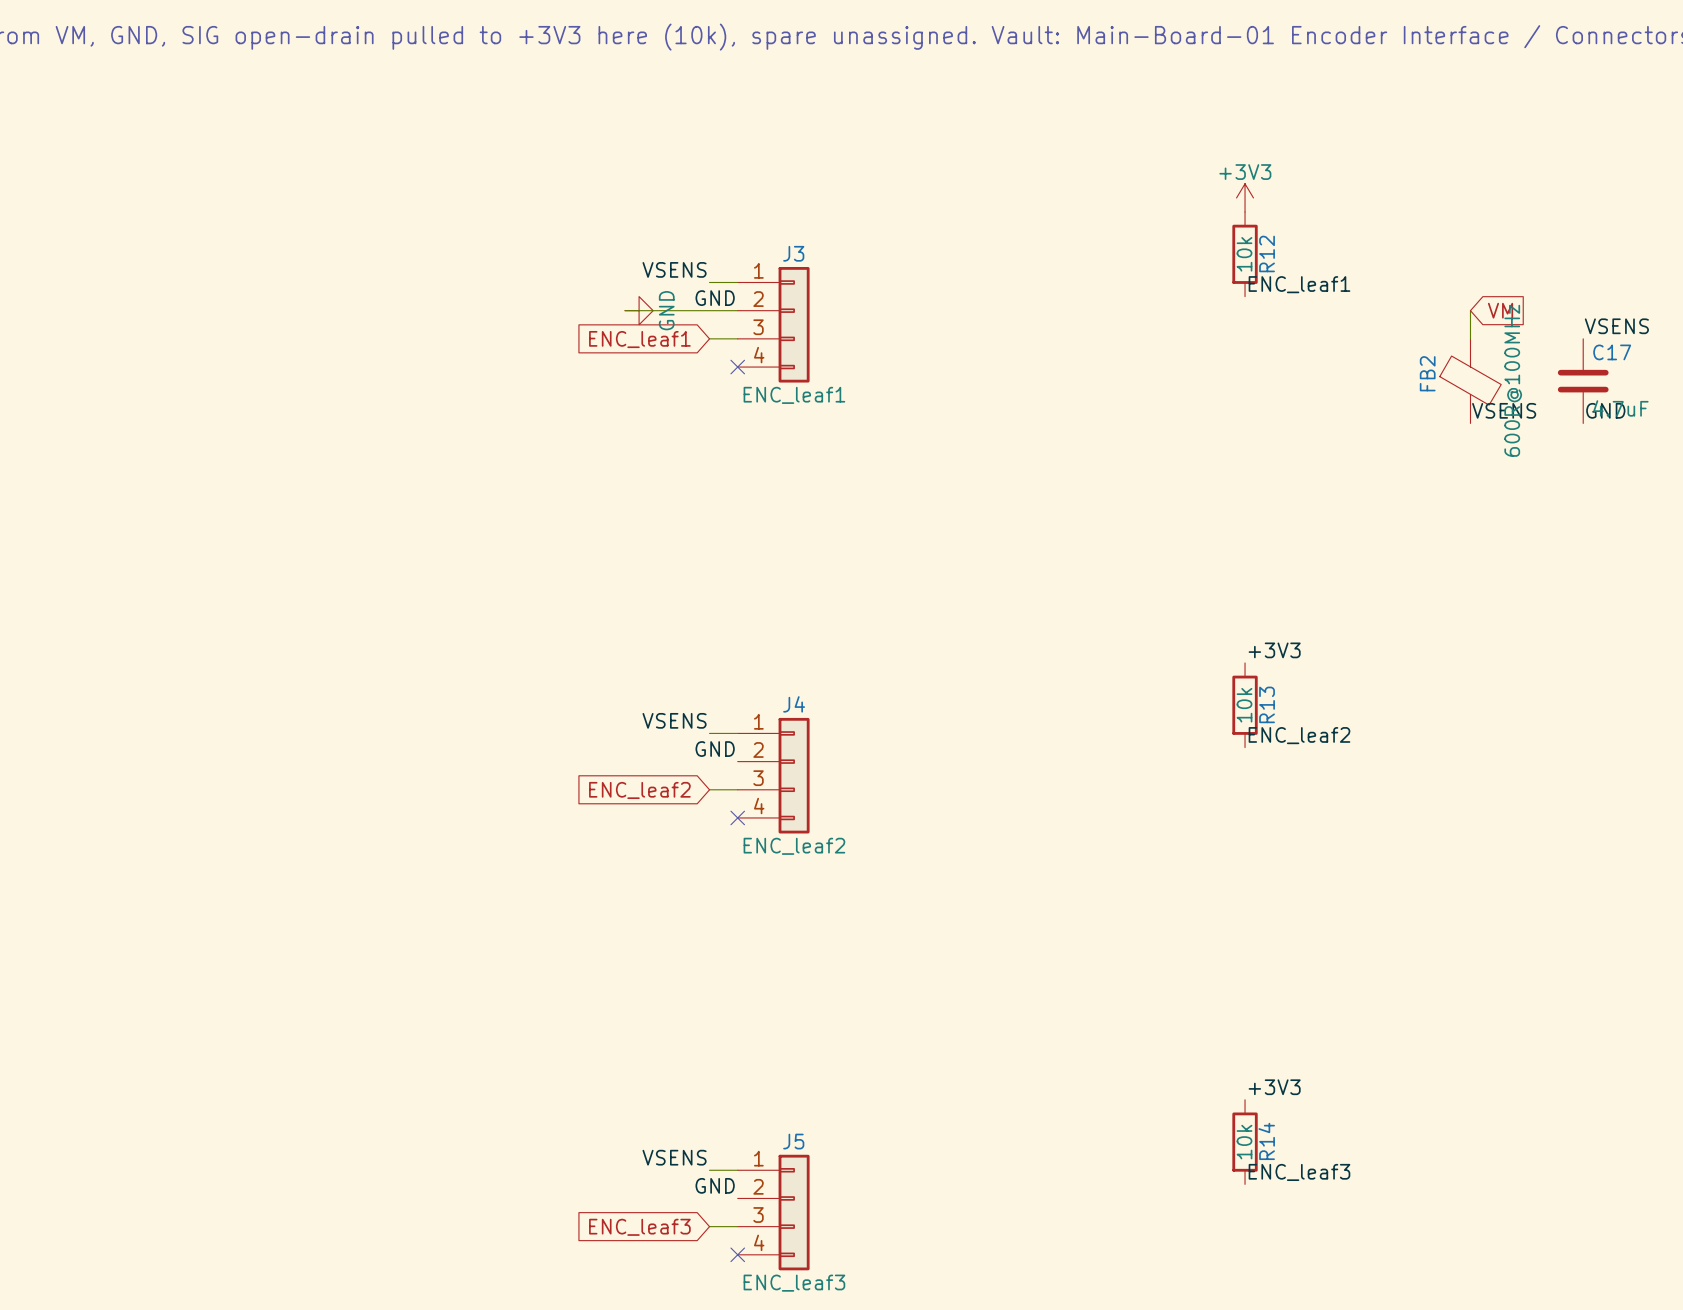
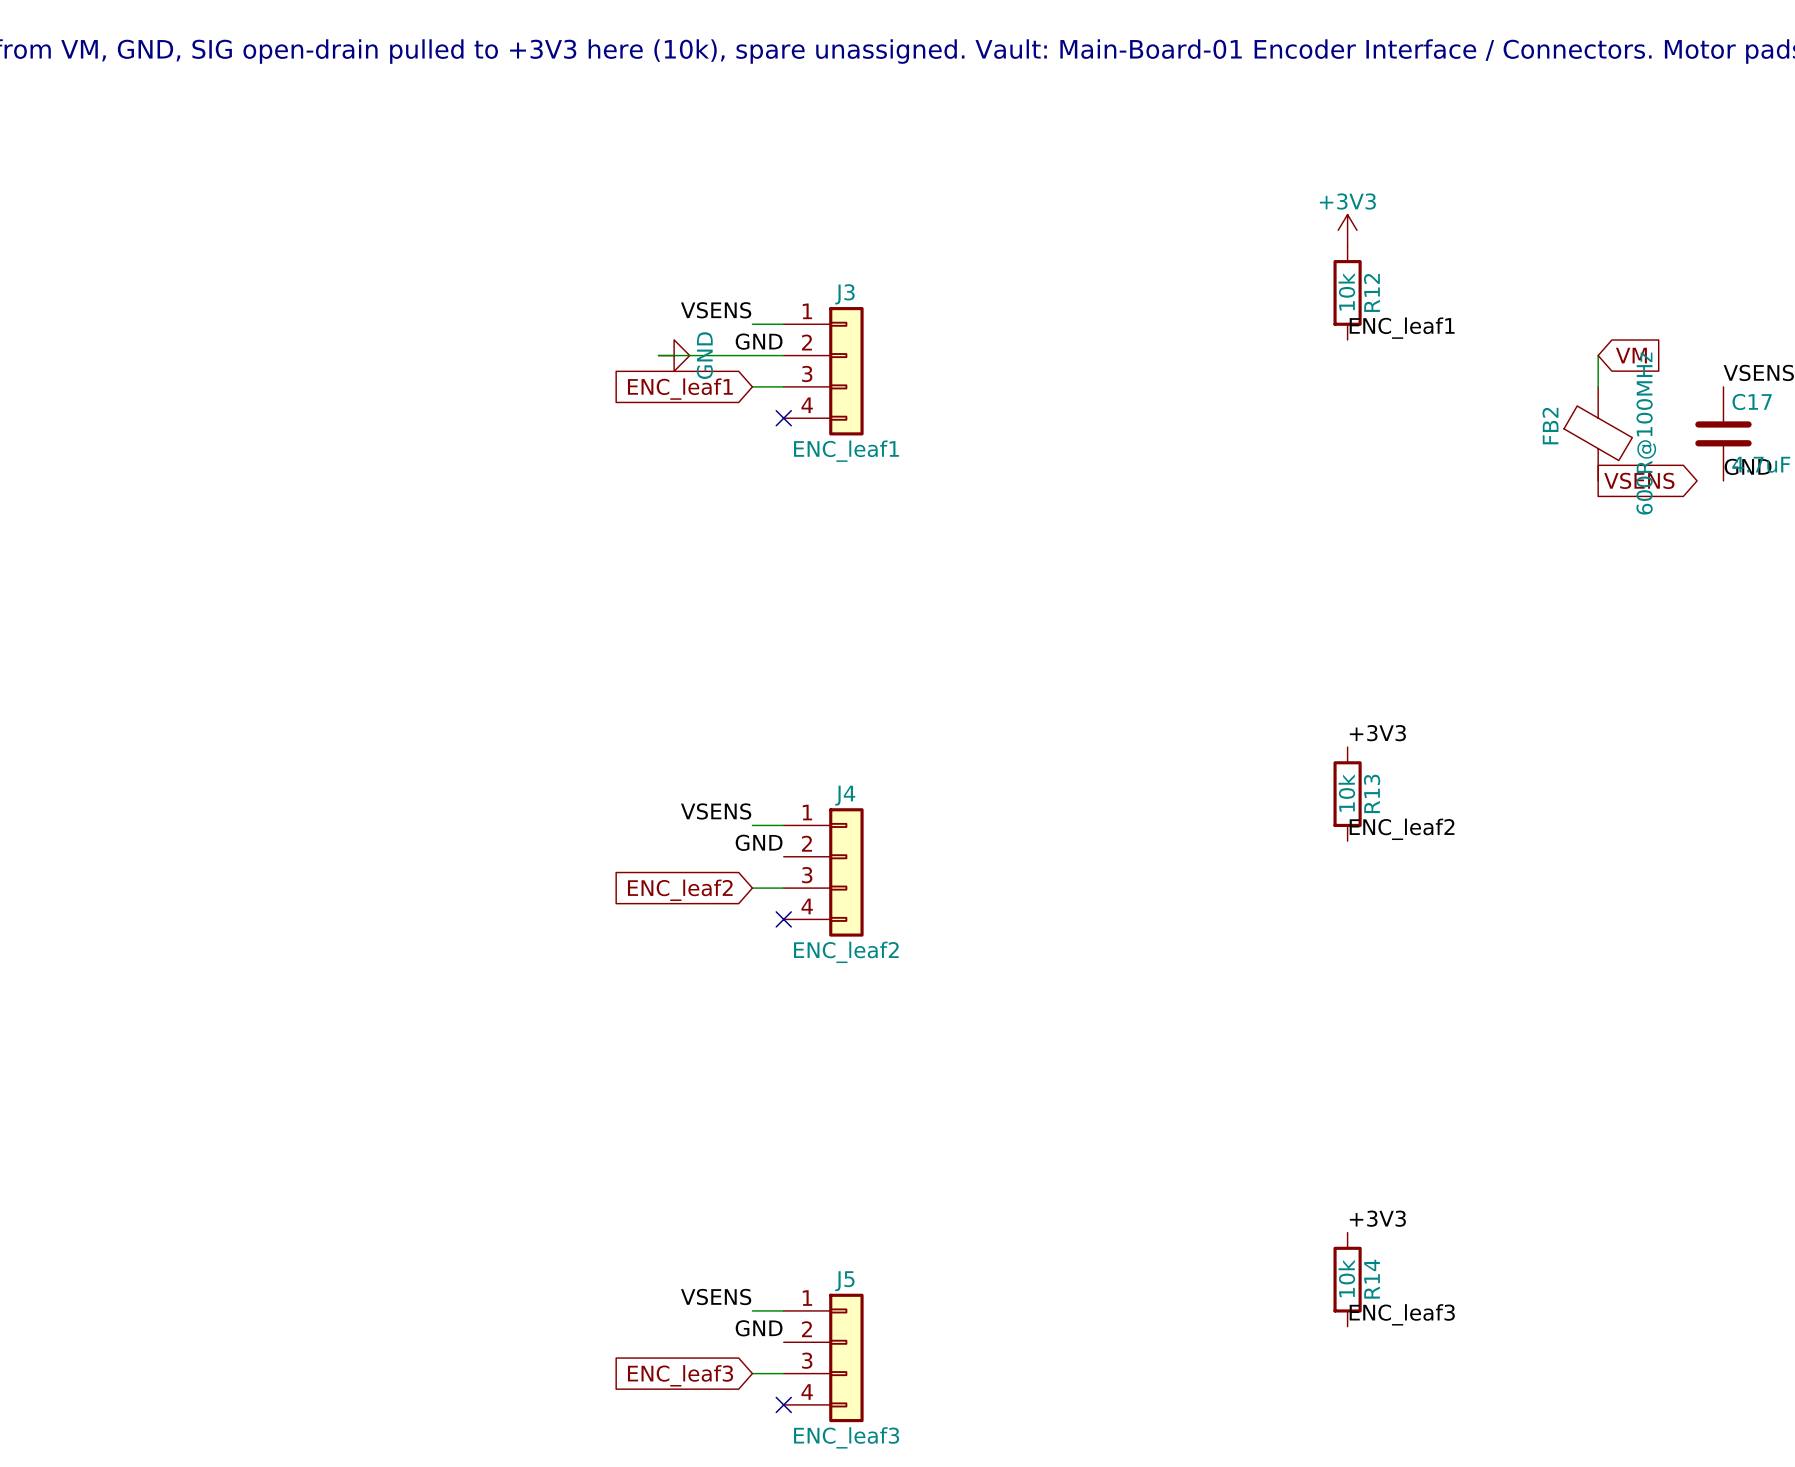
label: VSENS (1504, 410) -> none
global label: none -> VSENS (1639, 480)

